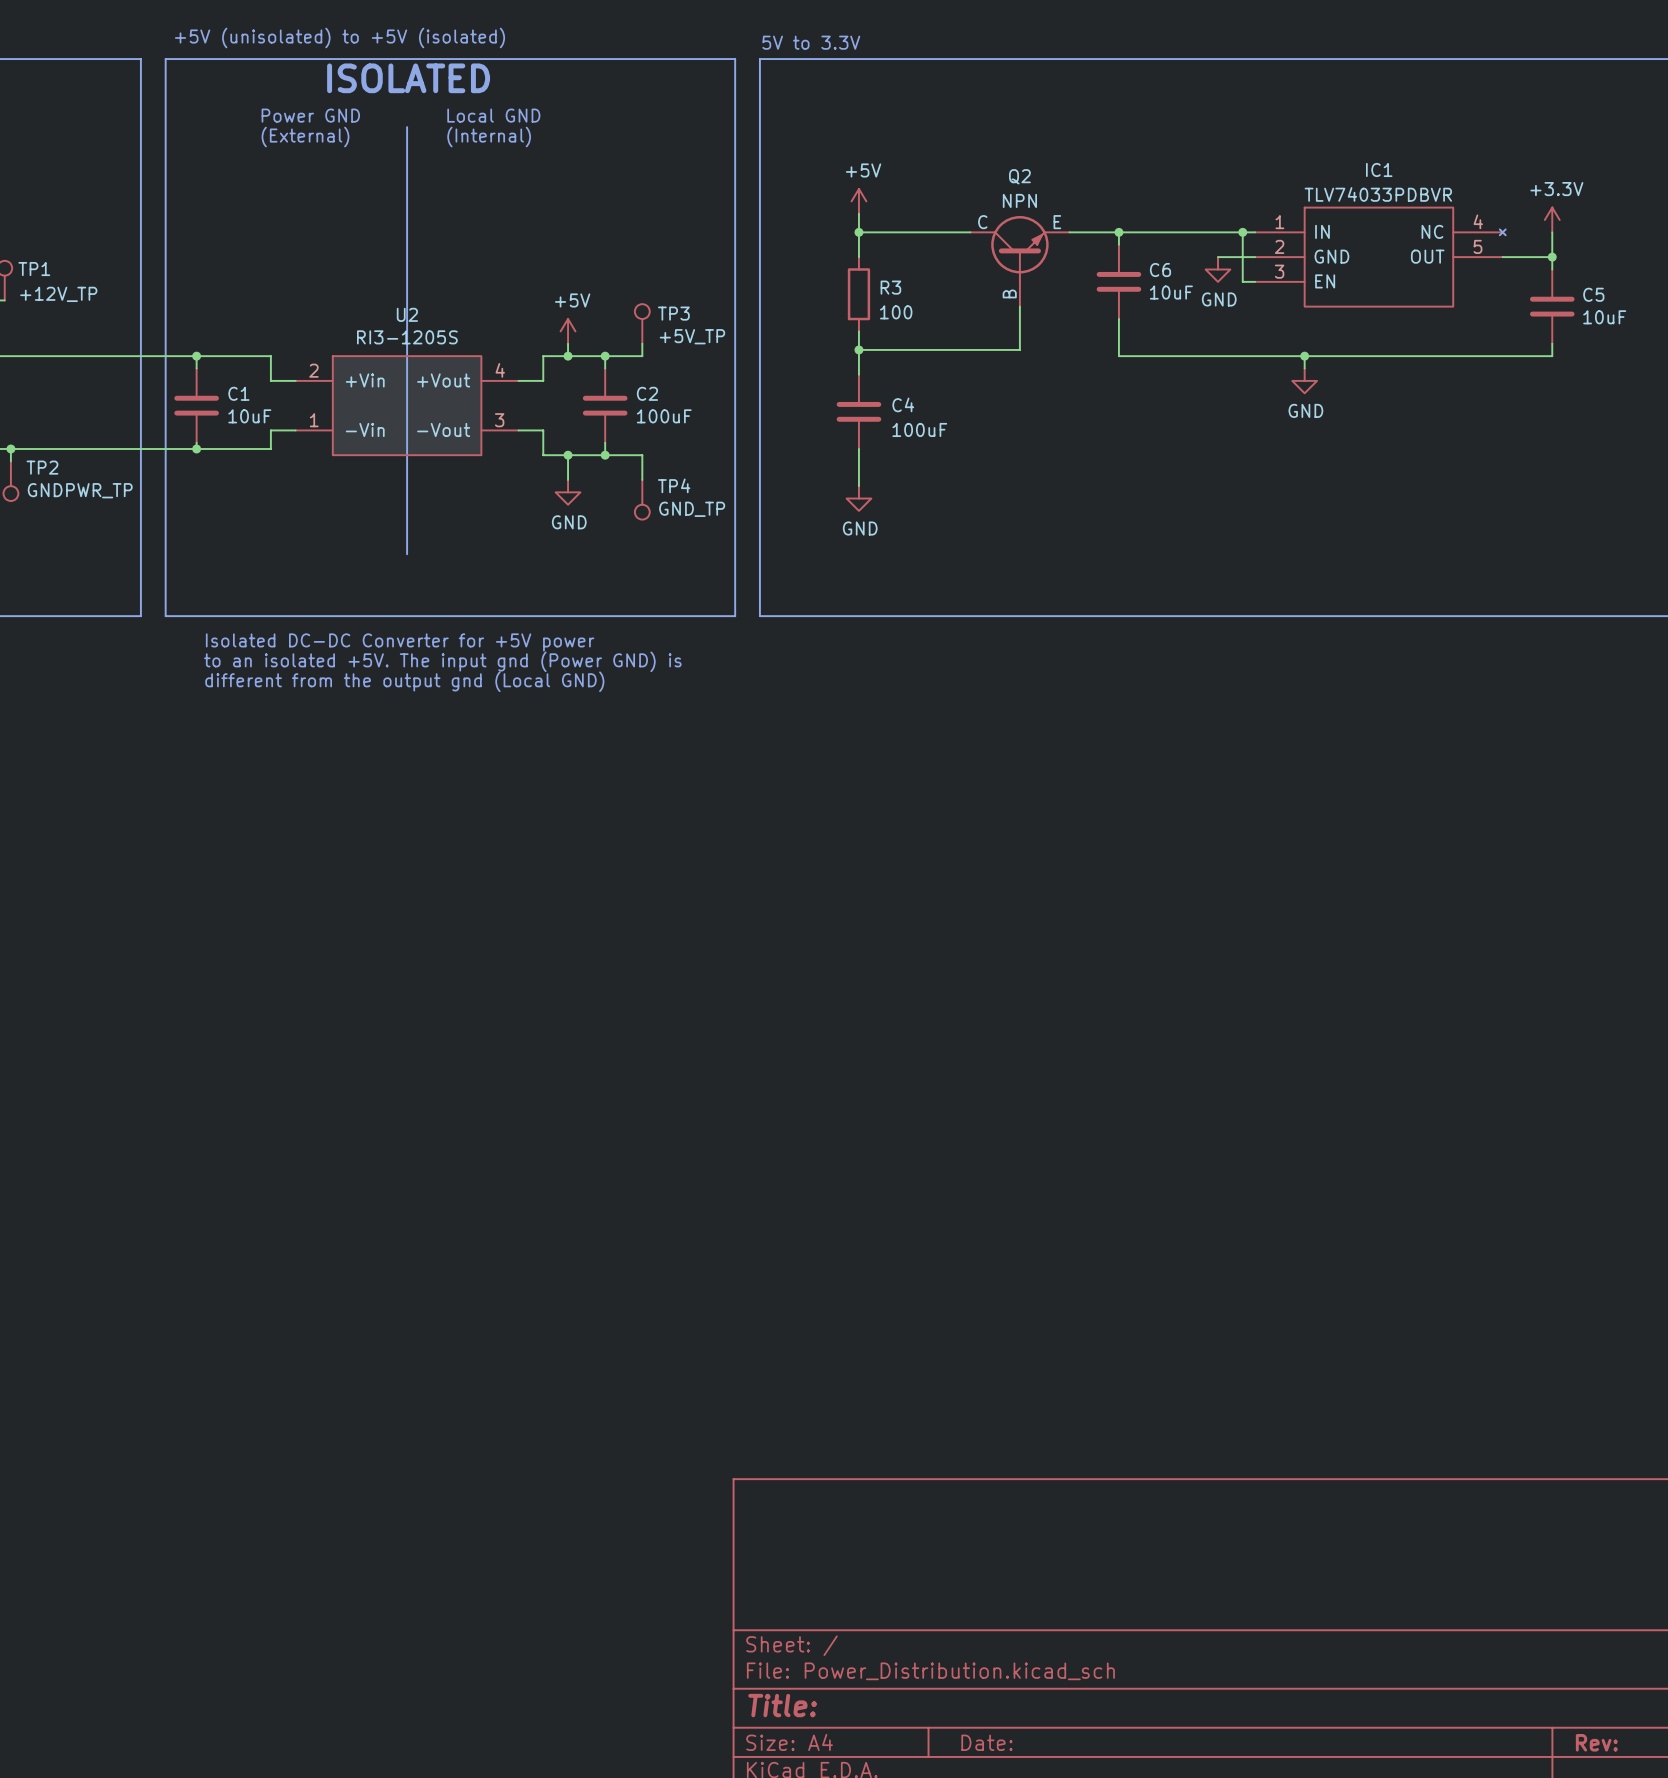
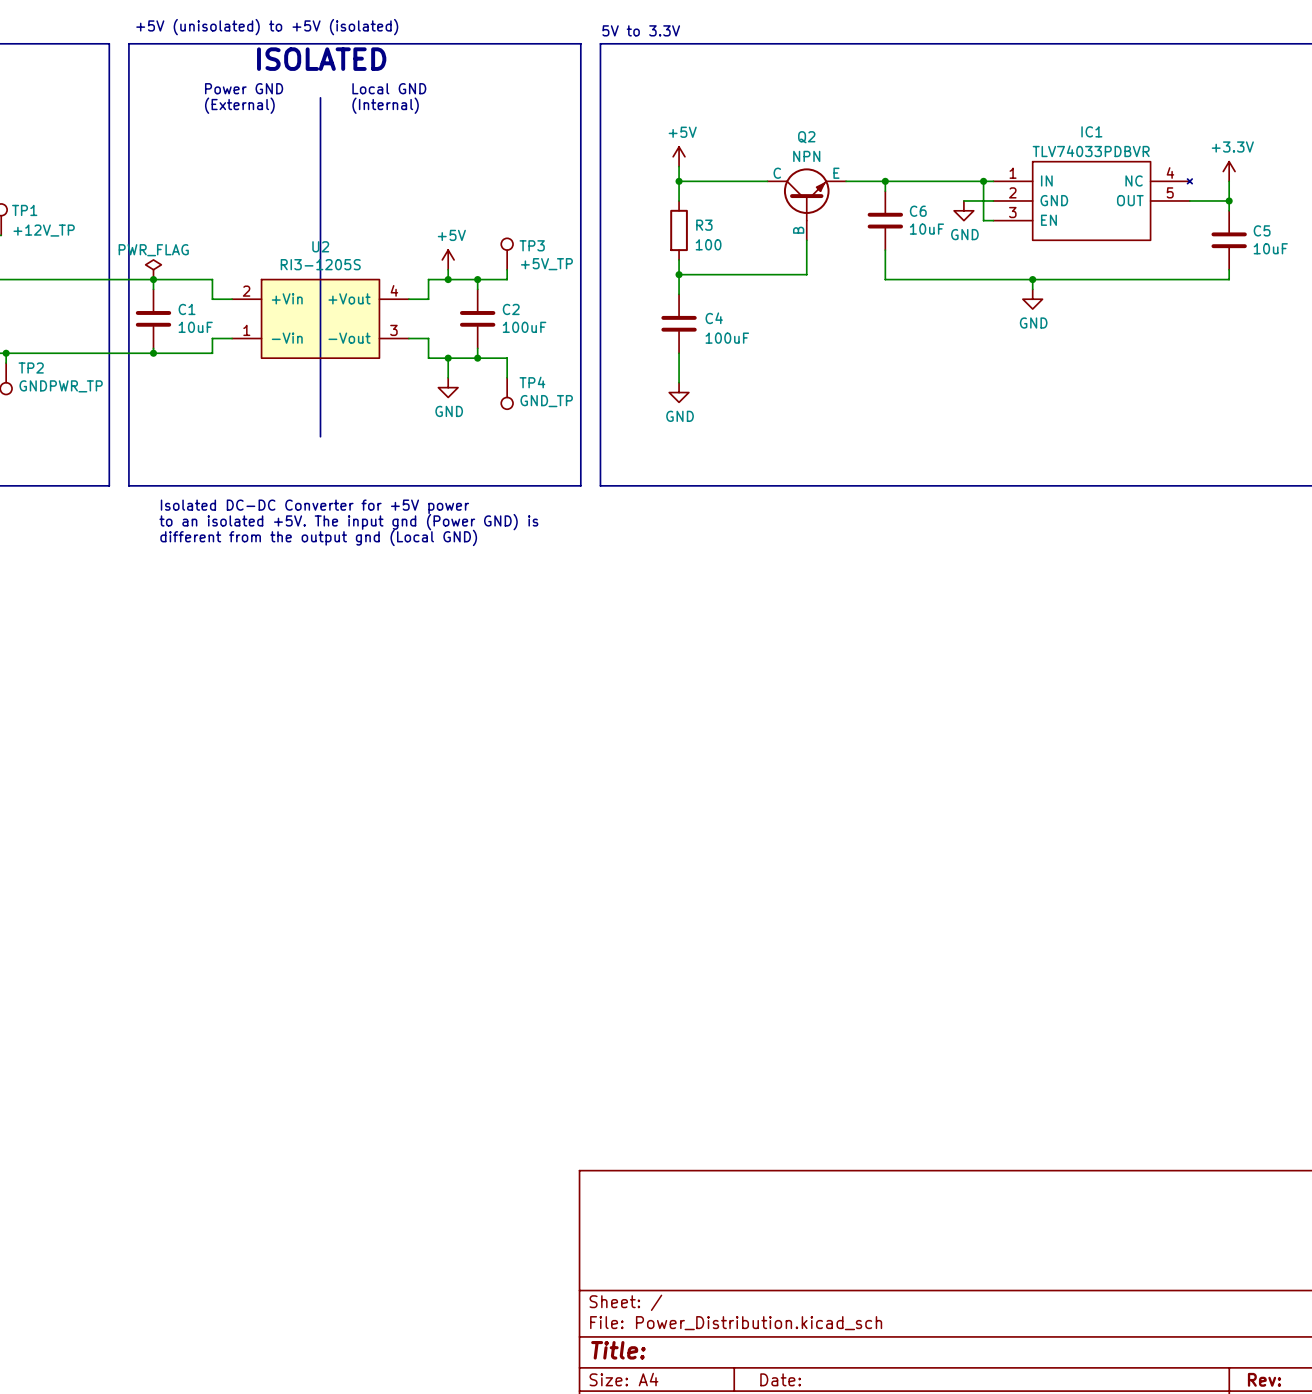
power symbol: none -> PWR_FLAG (153, 269)

